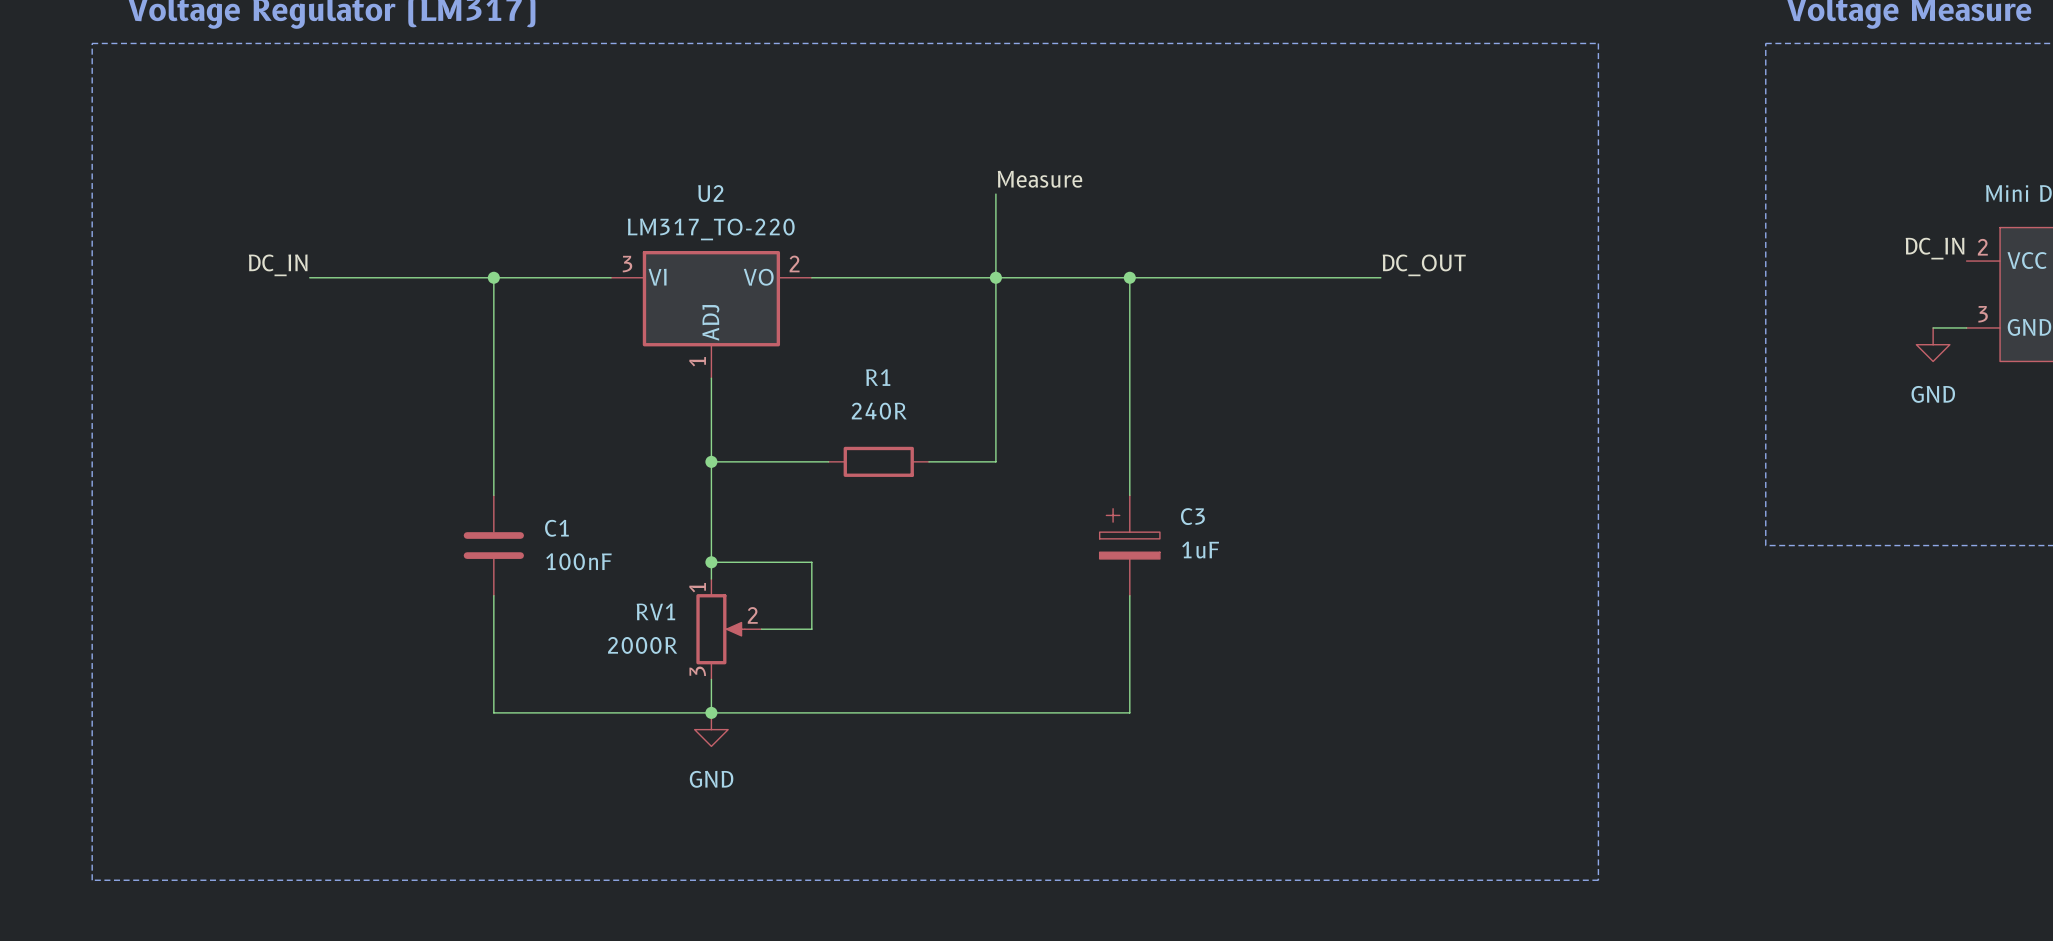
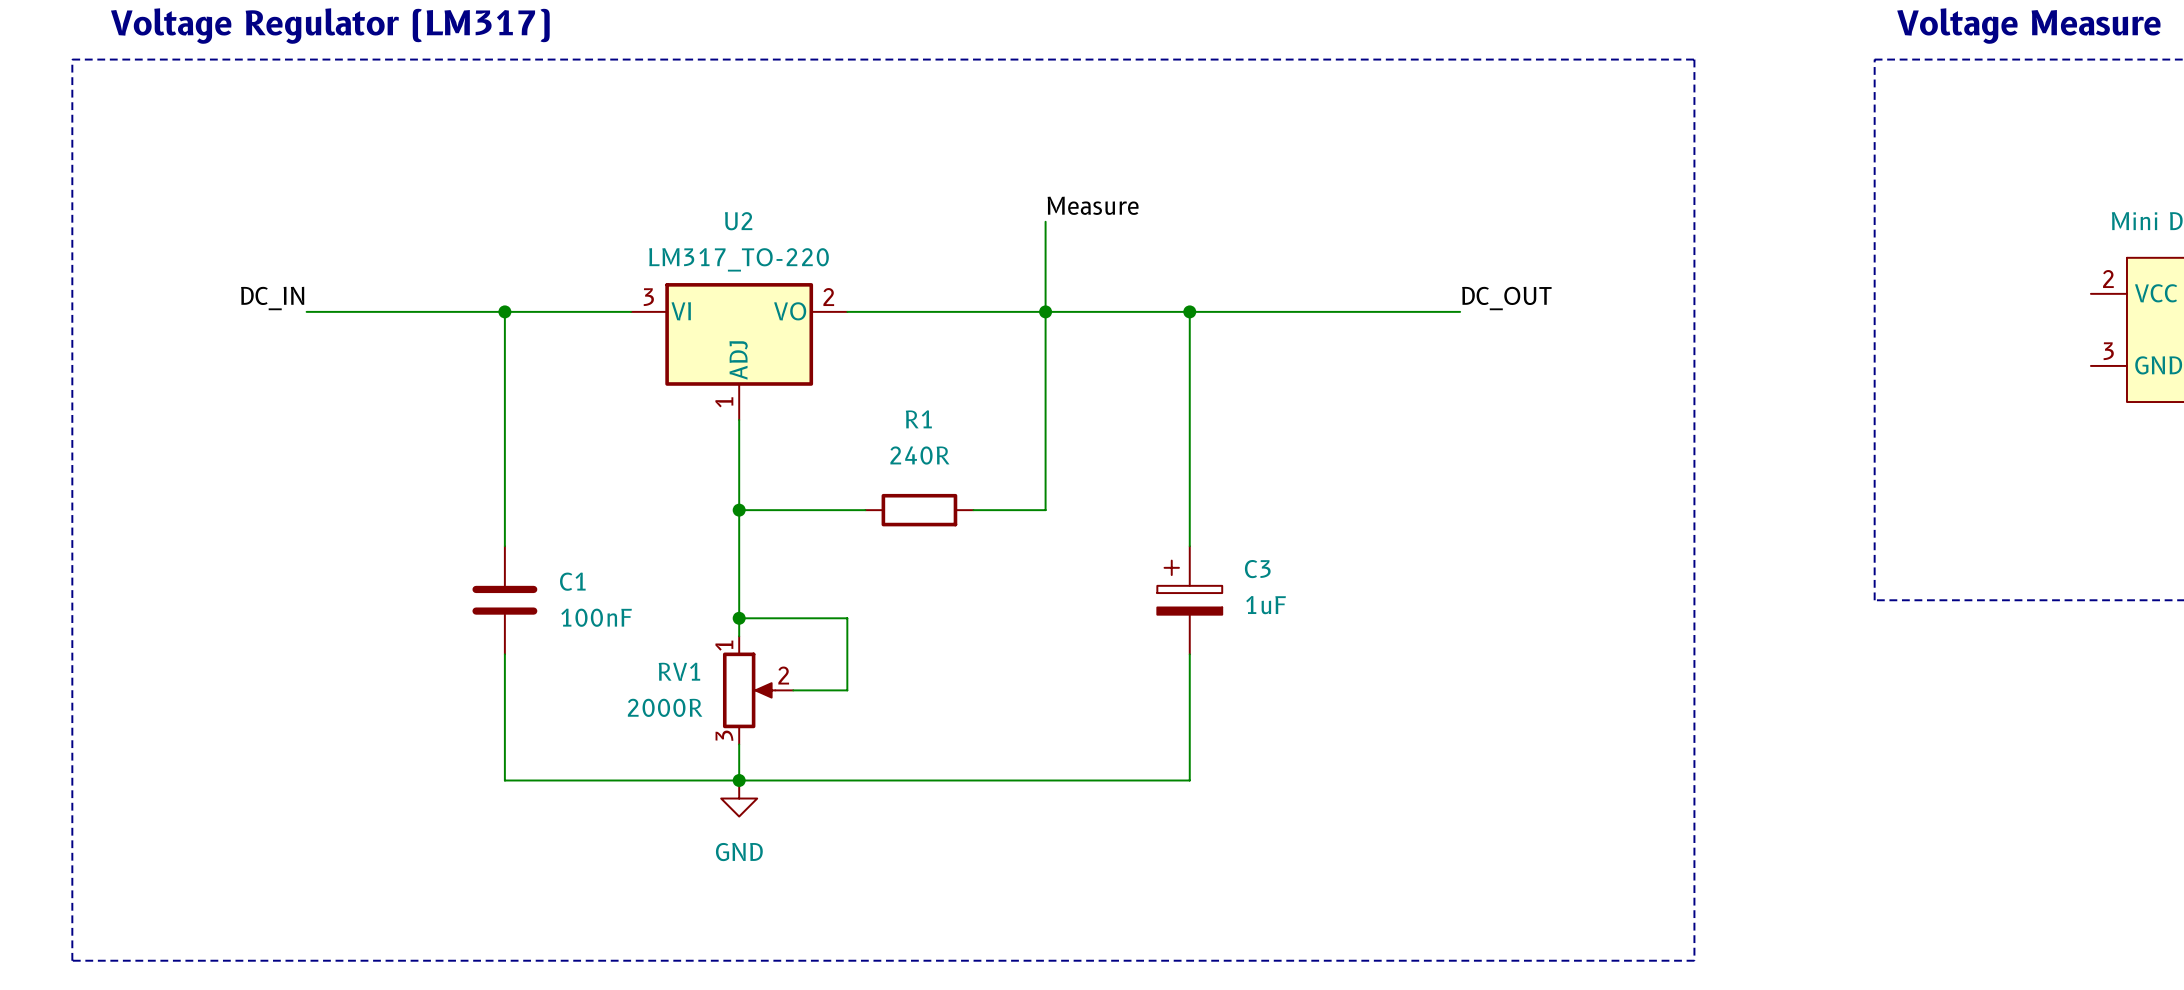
label: DC_IN (1935, 248) -> none
wire: (1933, 327) (1966, 327) -> none
power symbol: GND (1933, 344) -> none

